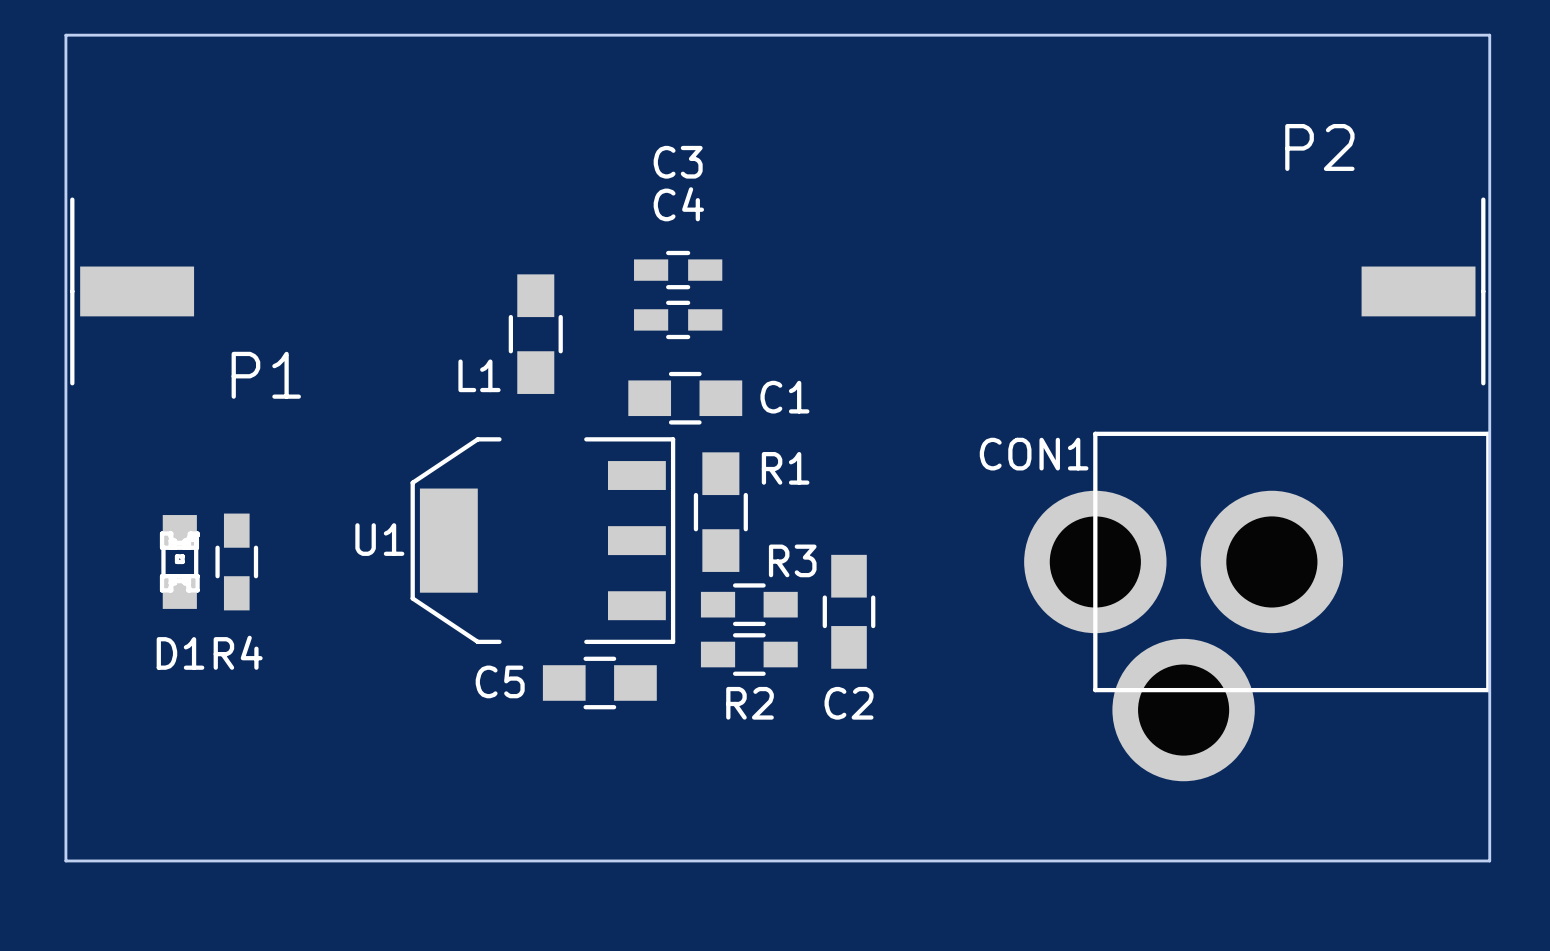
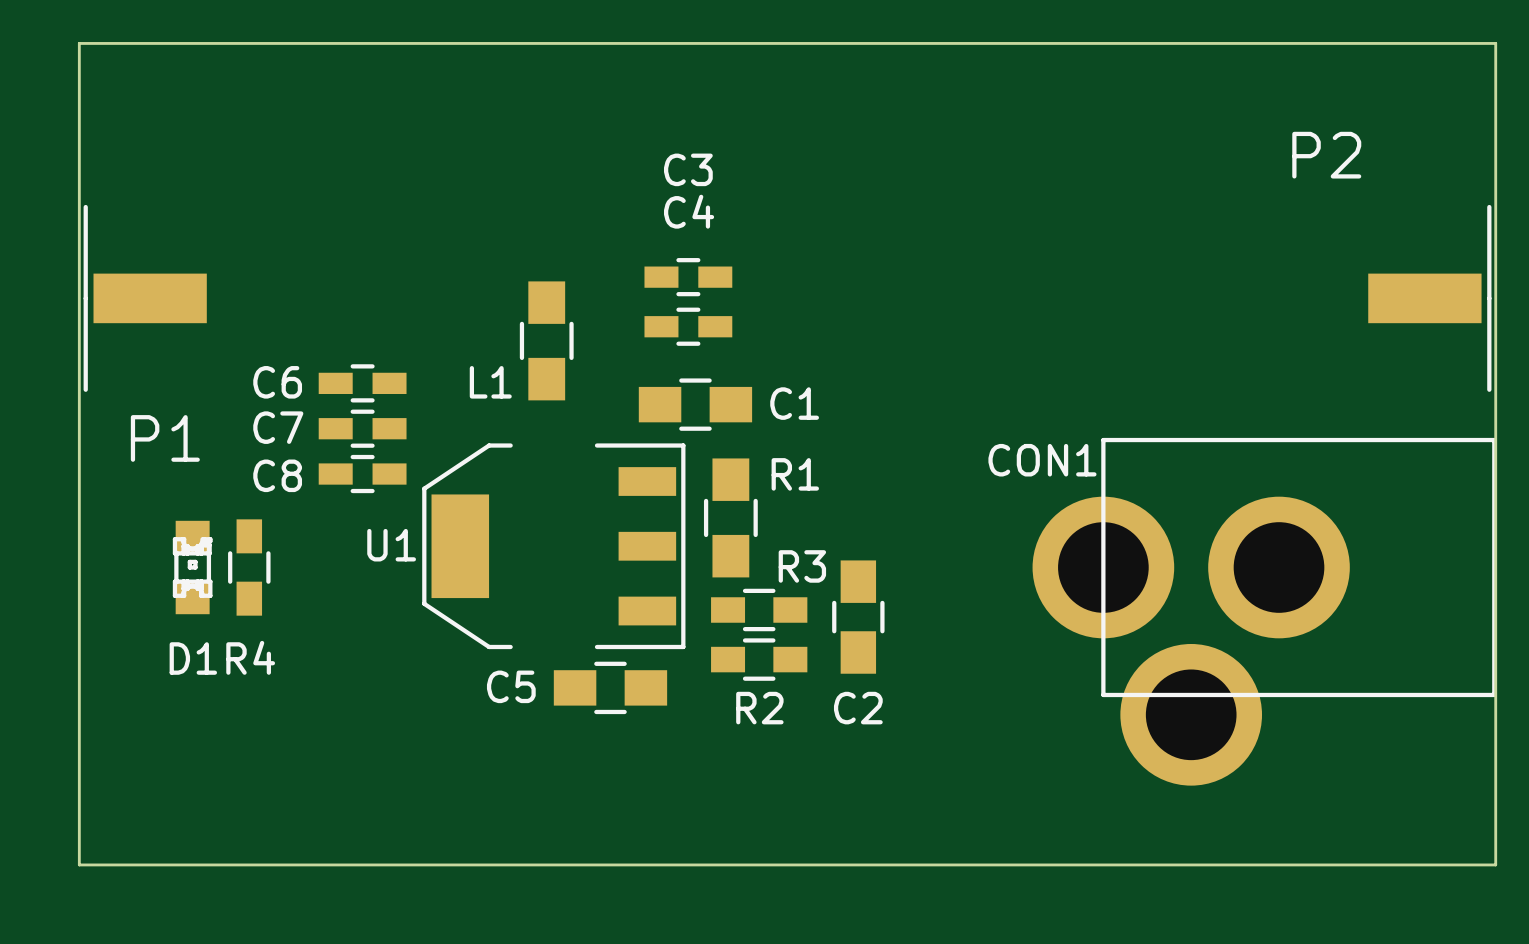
P1 name position: P1 (266, 375) -> P1 (165, 438)
C6: none -> (362, 383)
C7: none -> (362, 428)
C8: none -> (362, 474)

